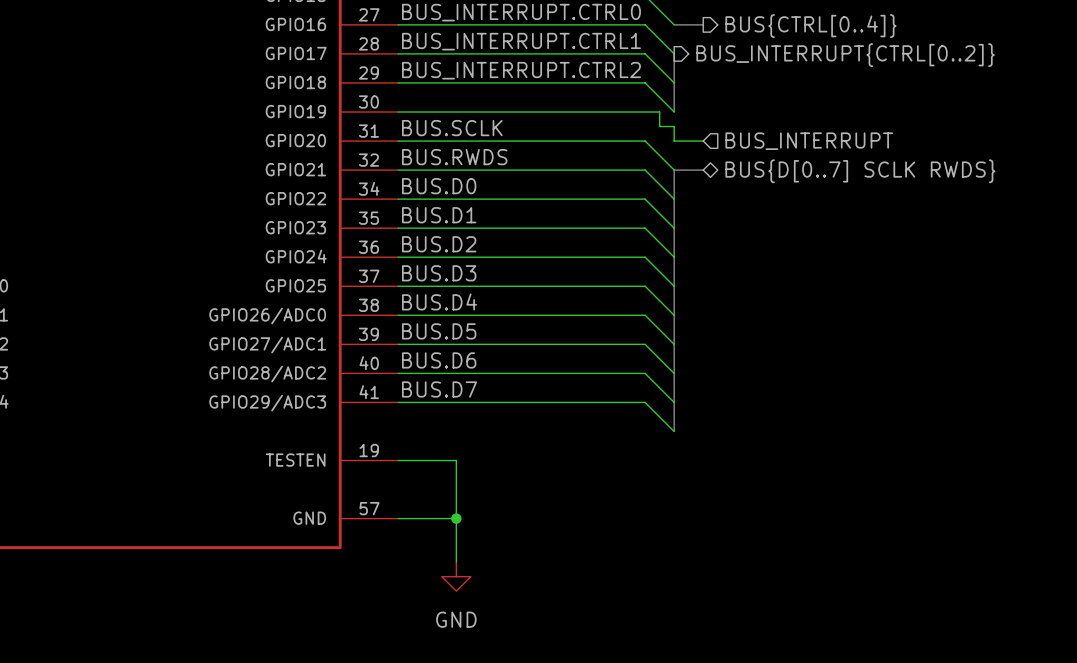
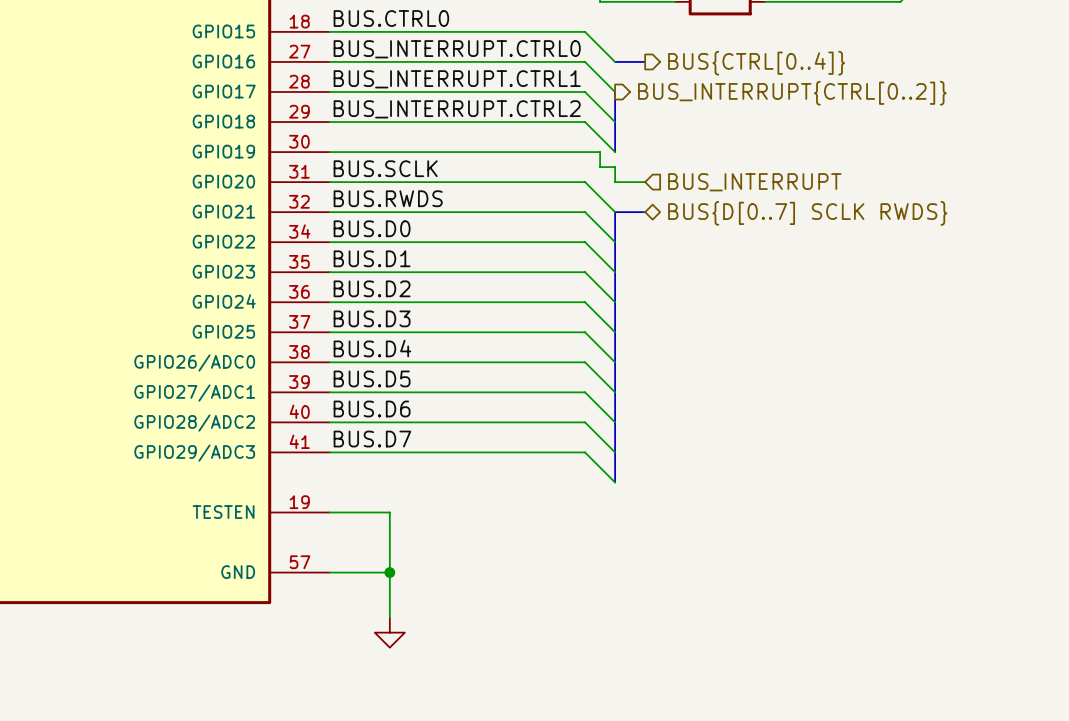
power symbol text: GND (456, 619) -> none

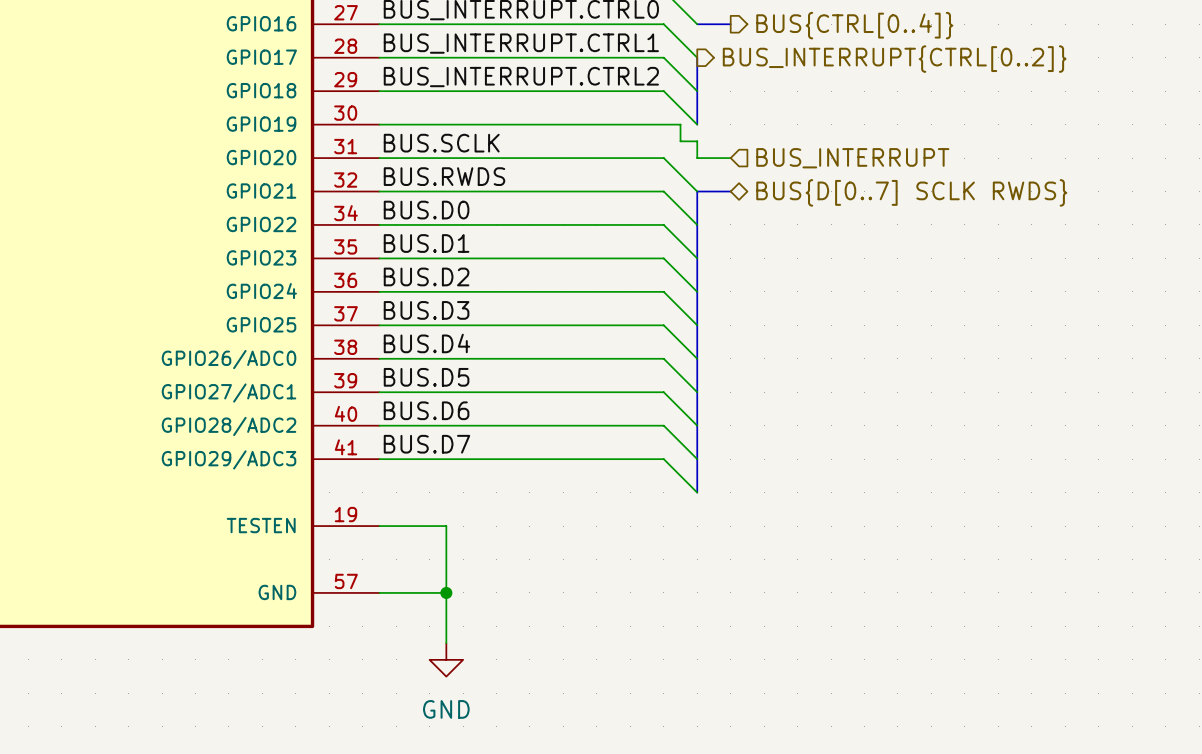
power symbol text: none -> GND (446, 709)

